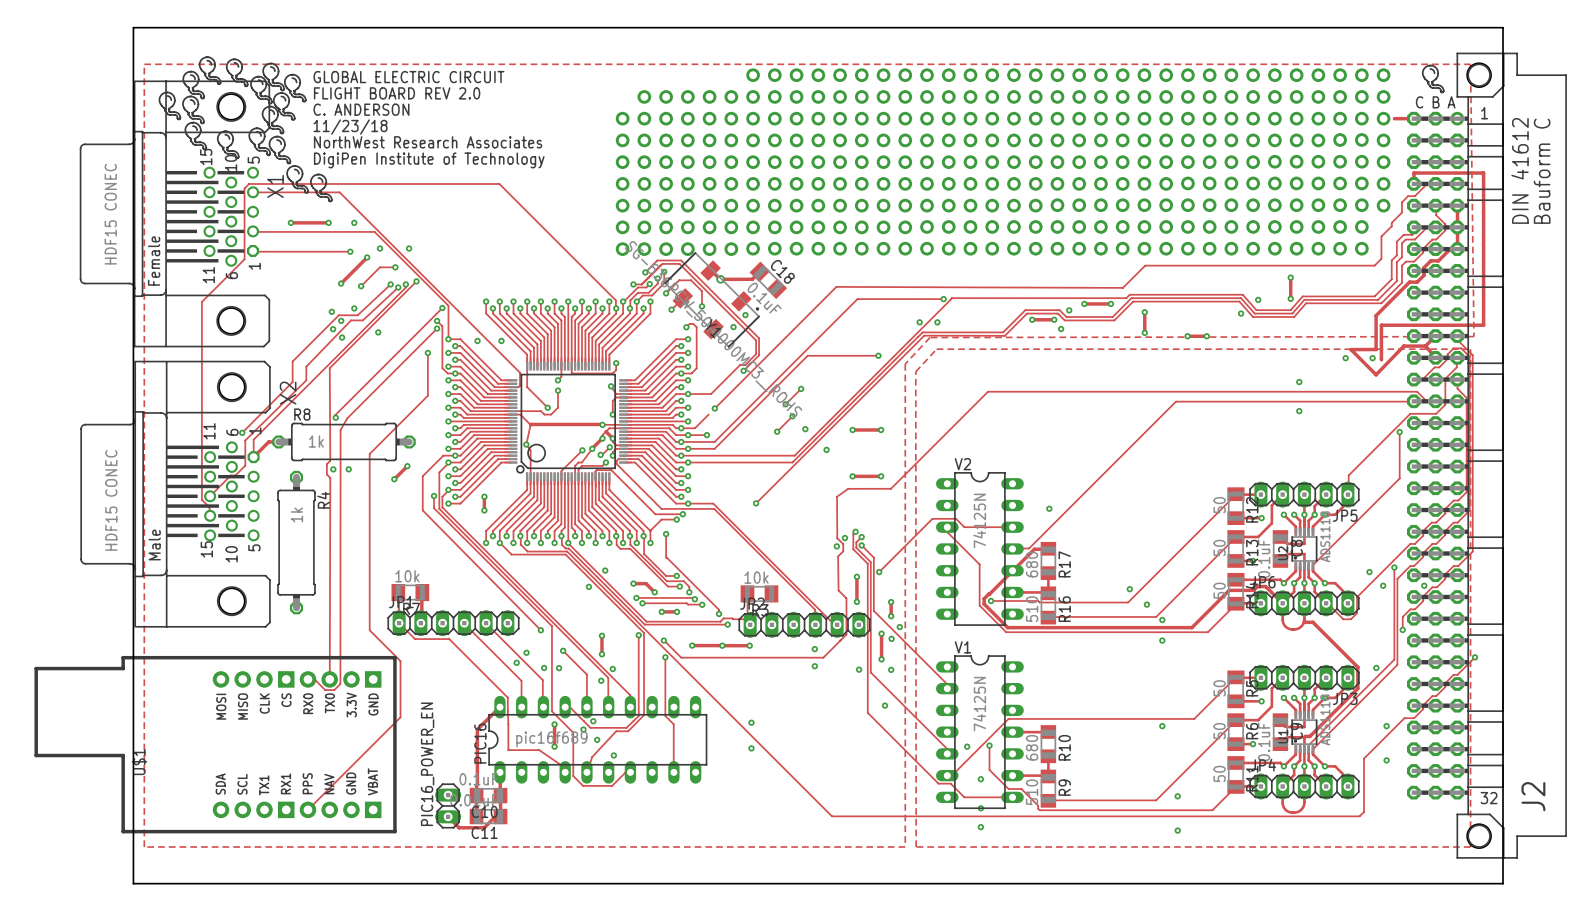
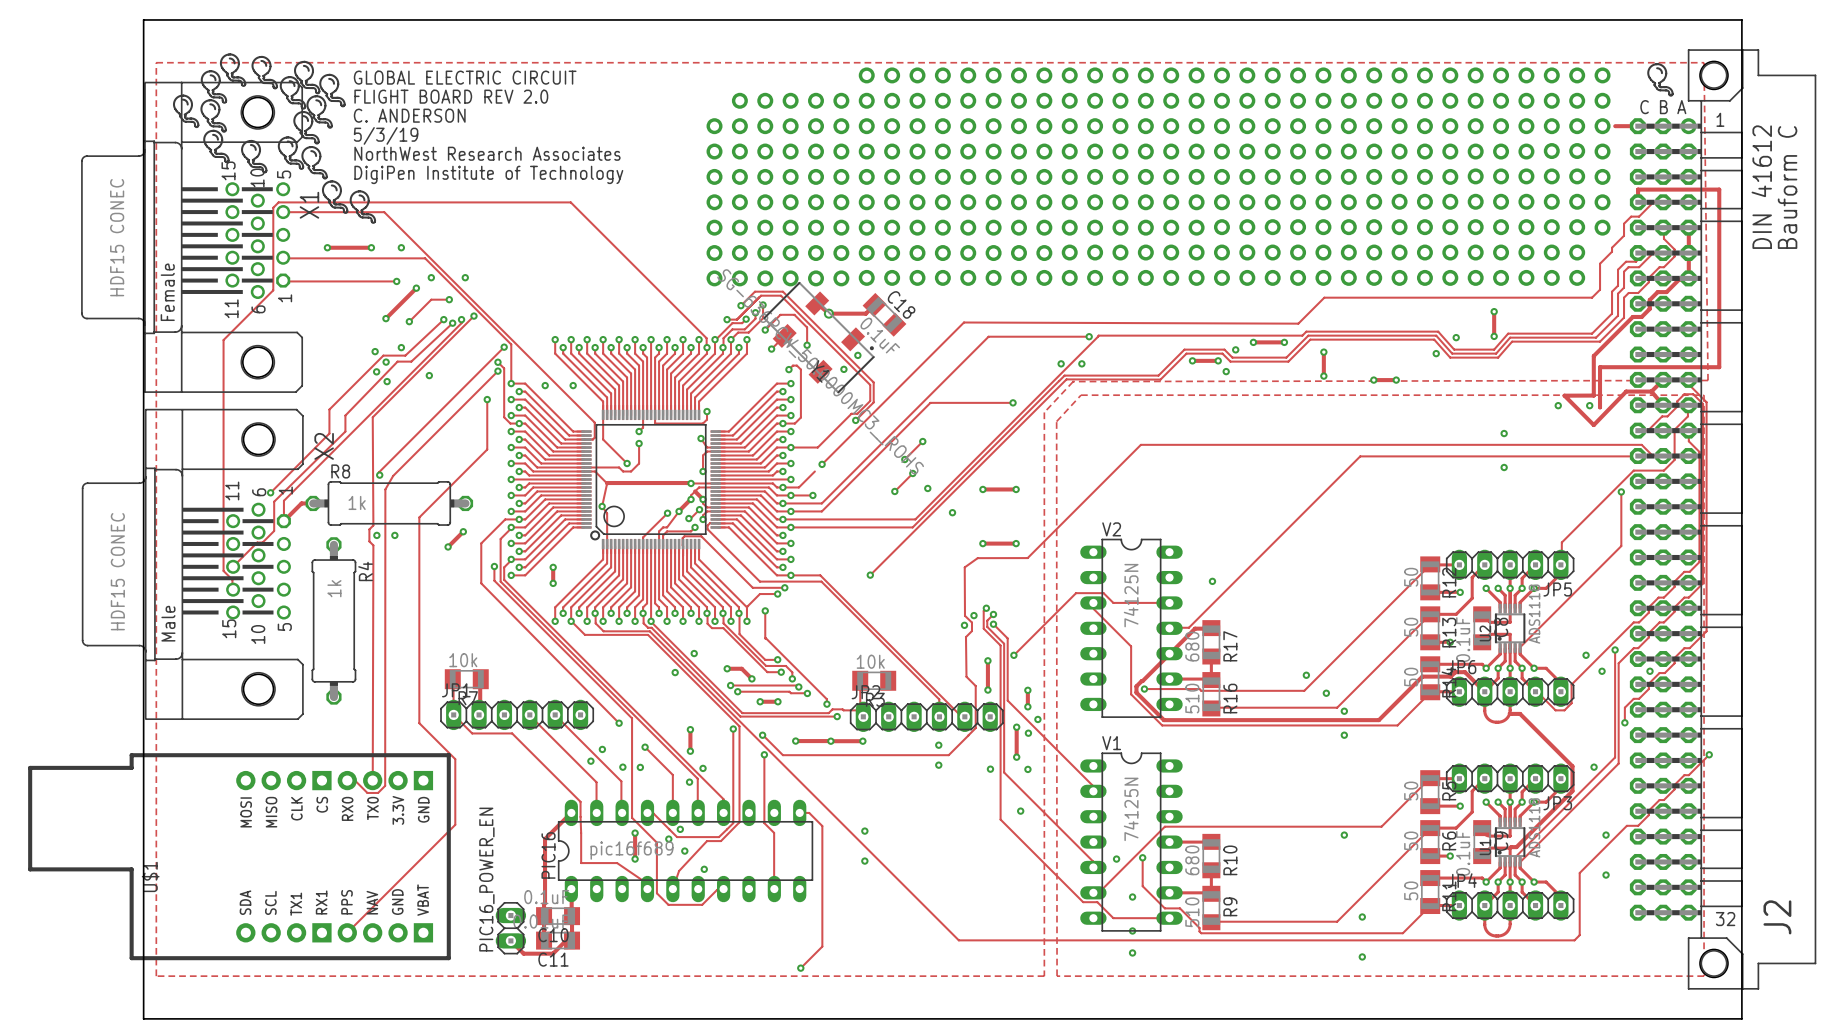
text: 11/23/18 (350, 127) -> 5/3/19 (386, 135)
track: none -> (799, 812) (809, 812) (822, 826) (822, 946) (800, 968)
via: none -> (800, 968)

